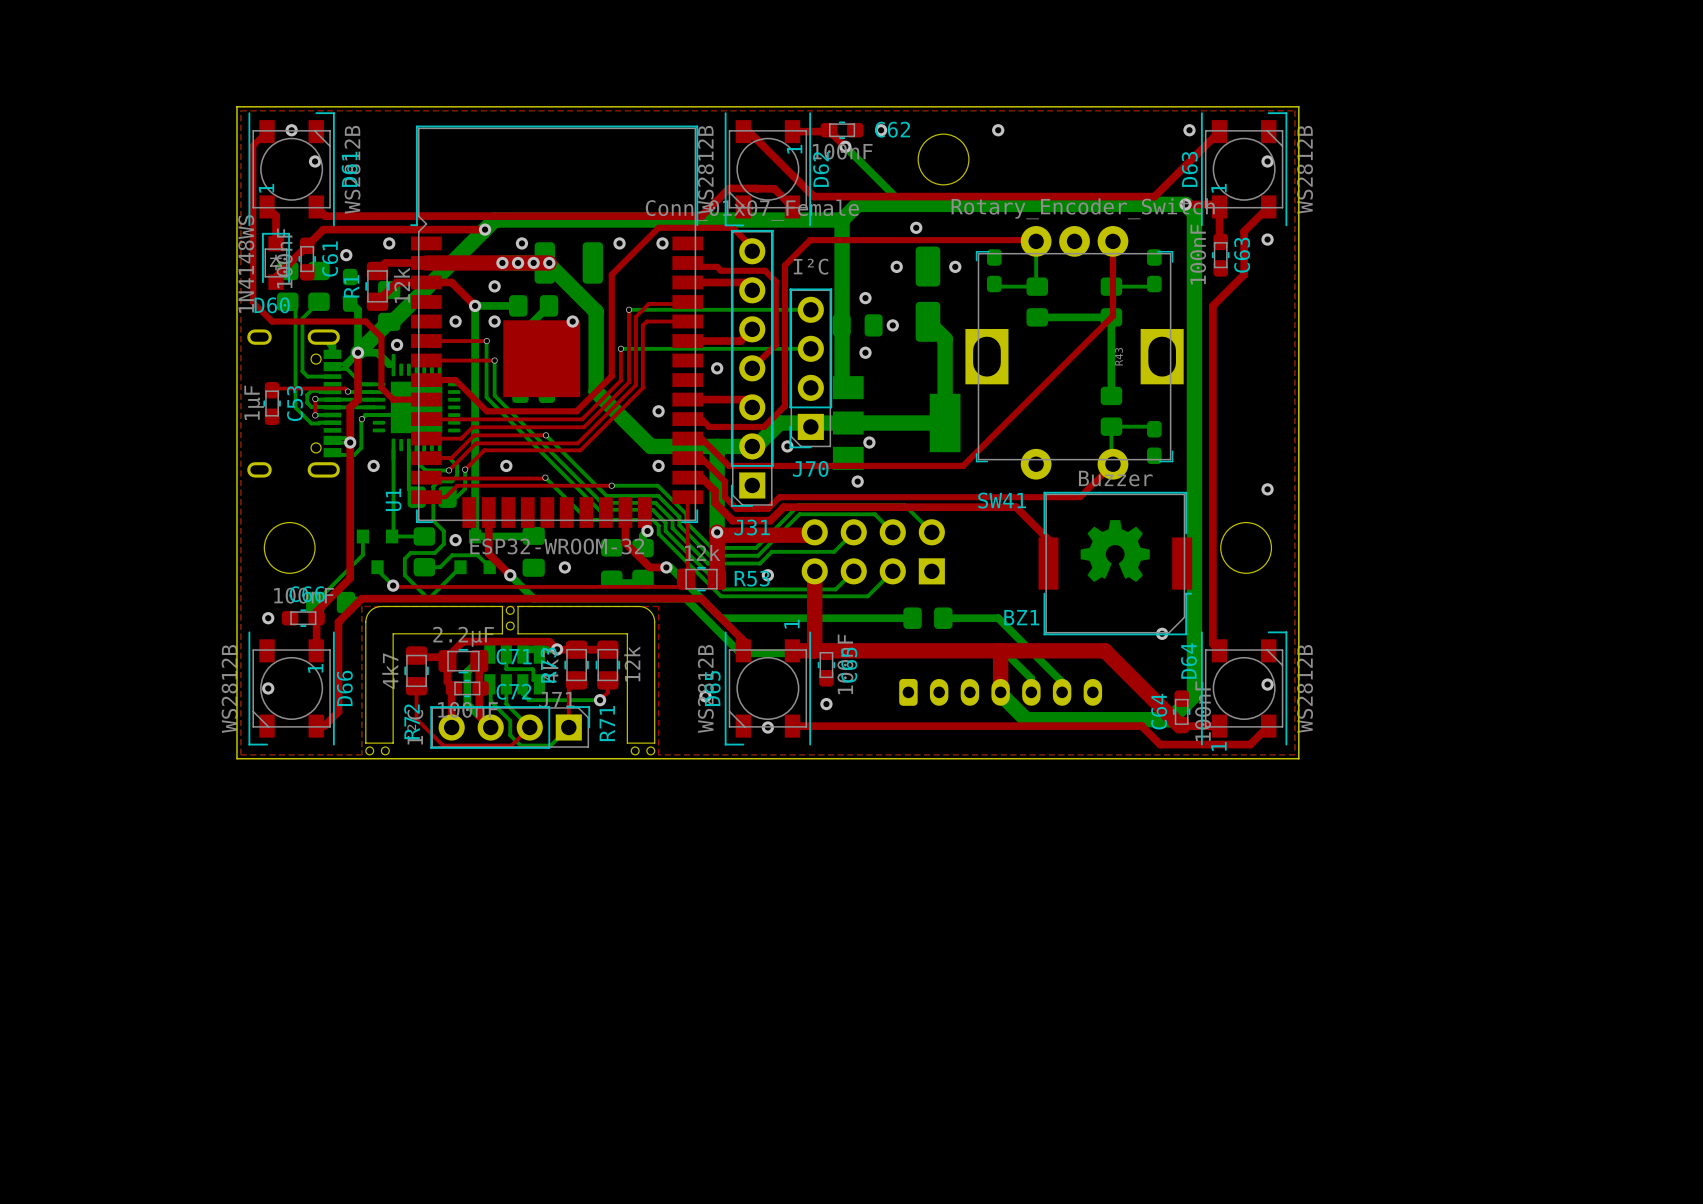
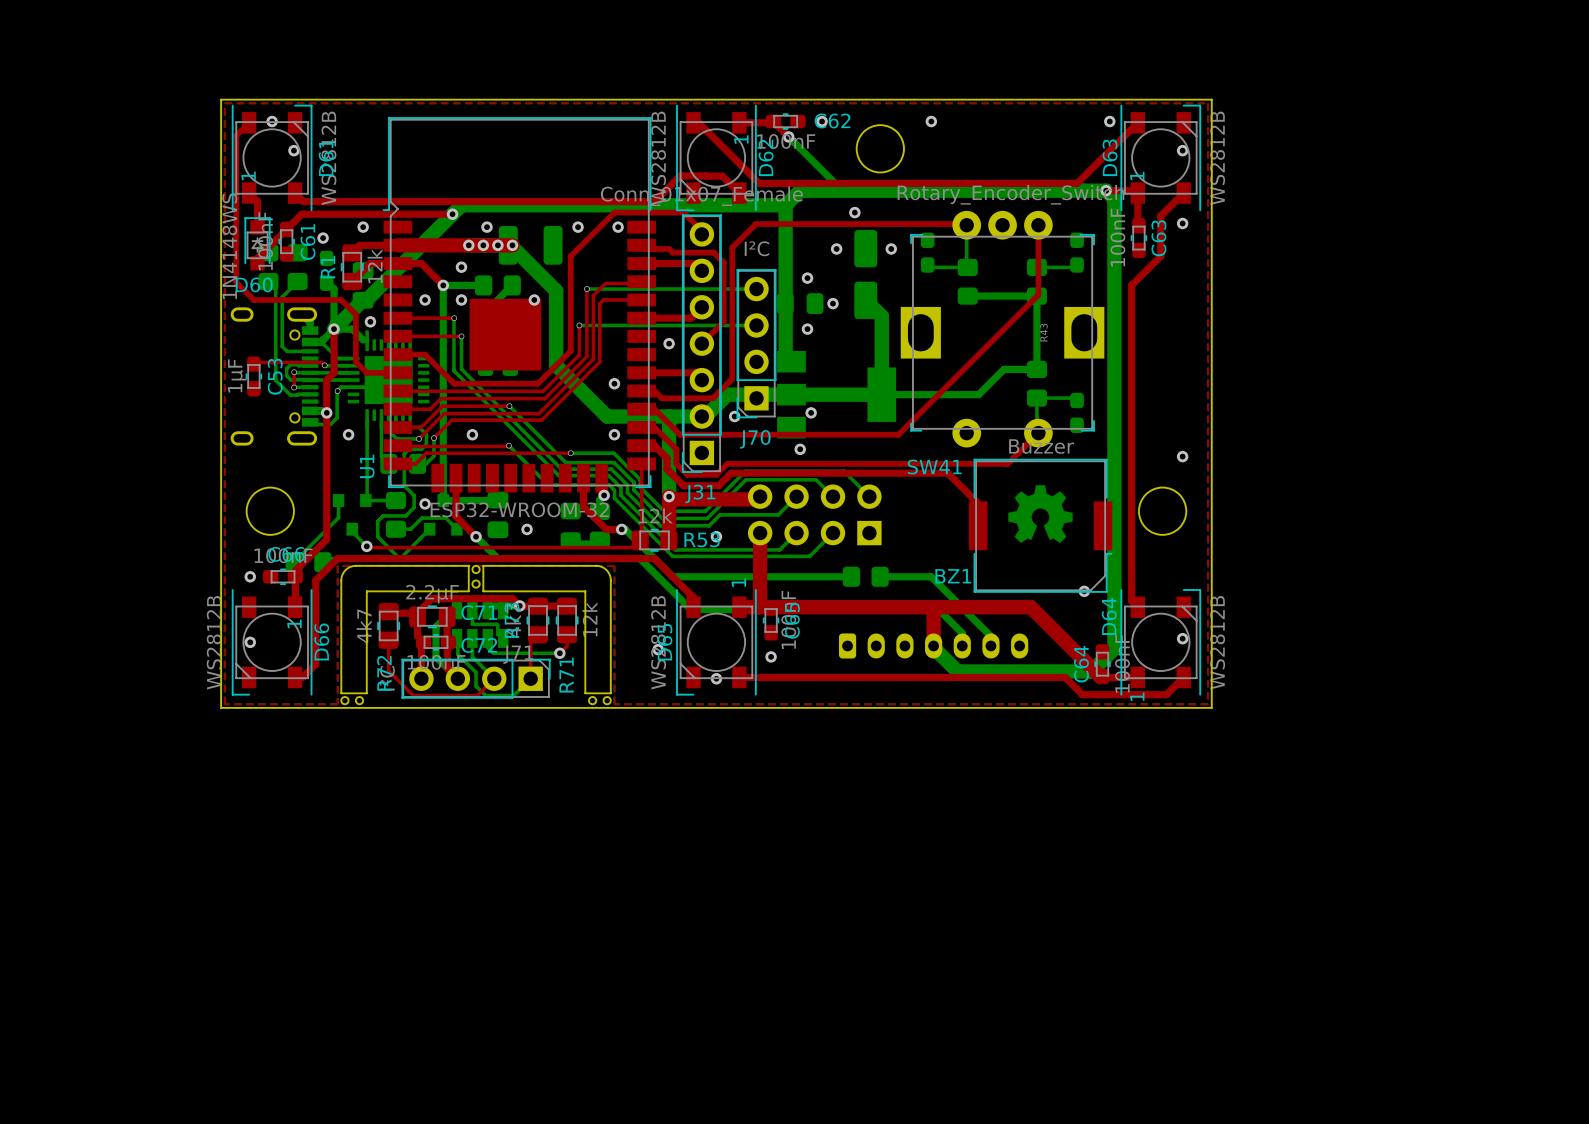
bottom track: none -> (1036, 369) (1003, 369) (978, 394) (881, 394)

